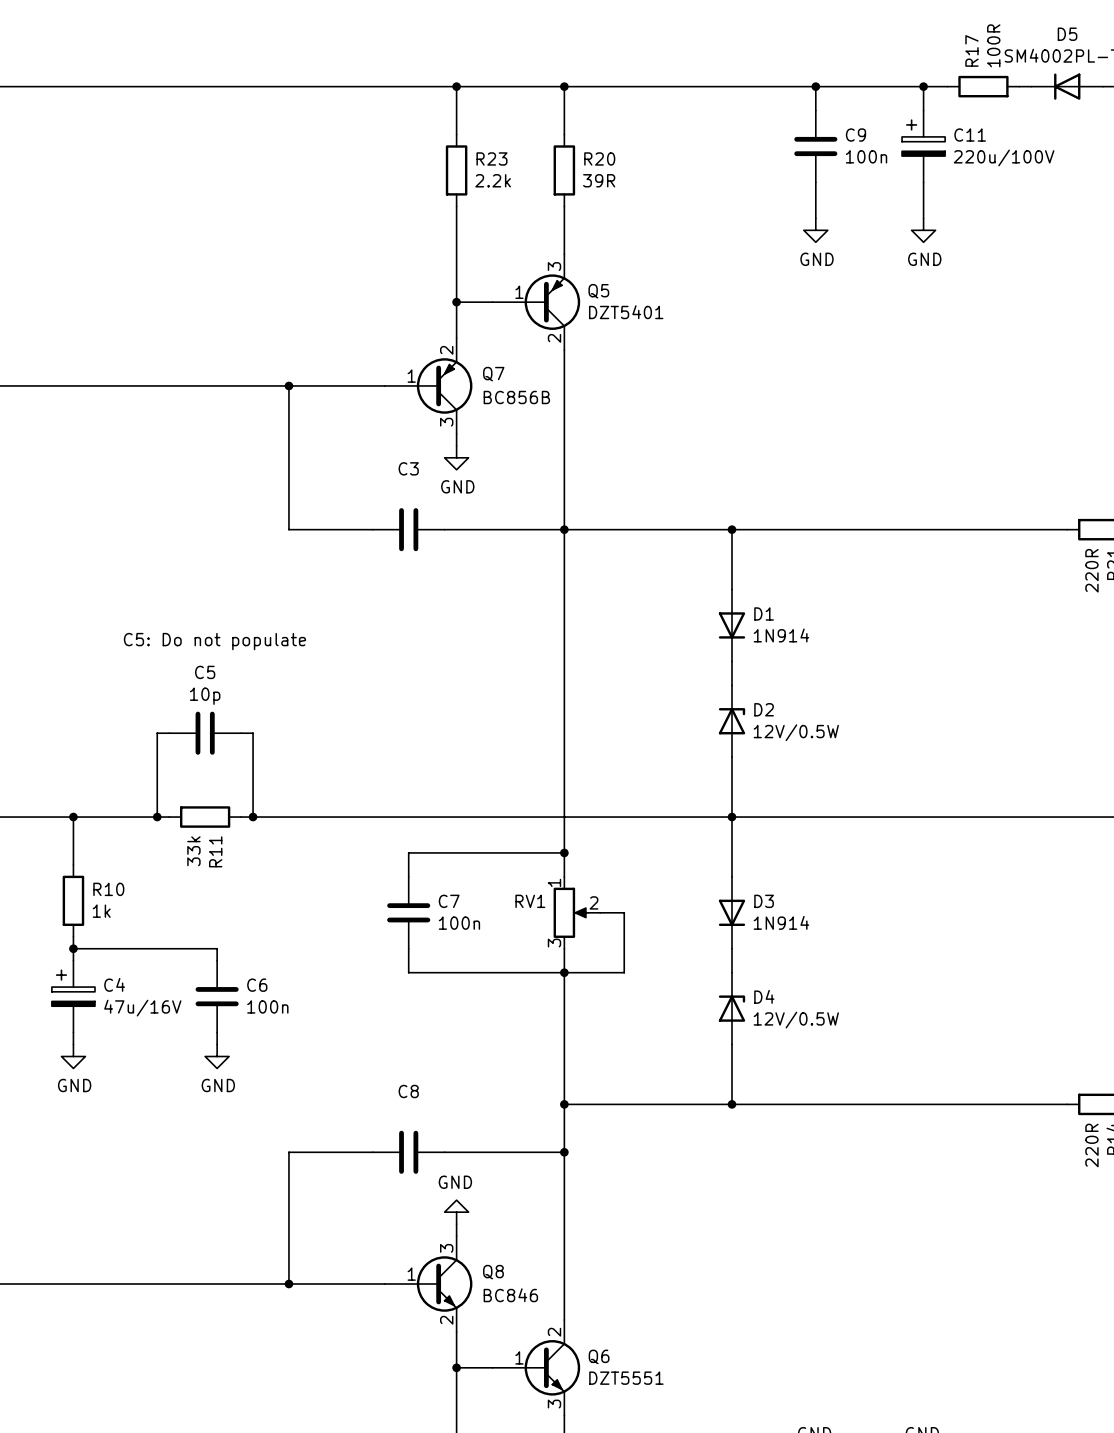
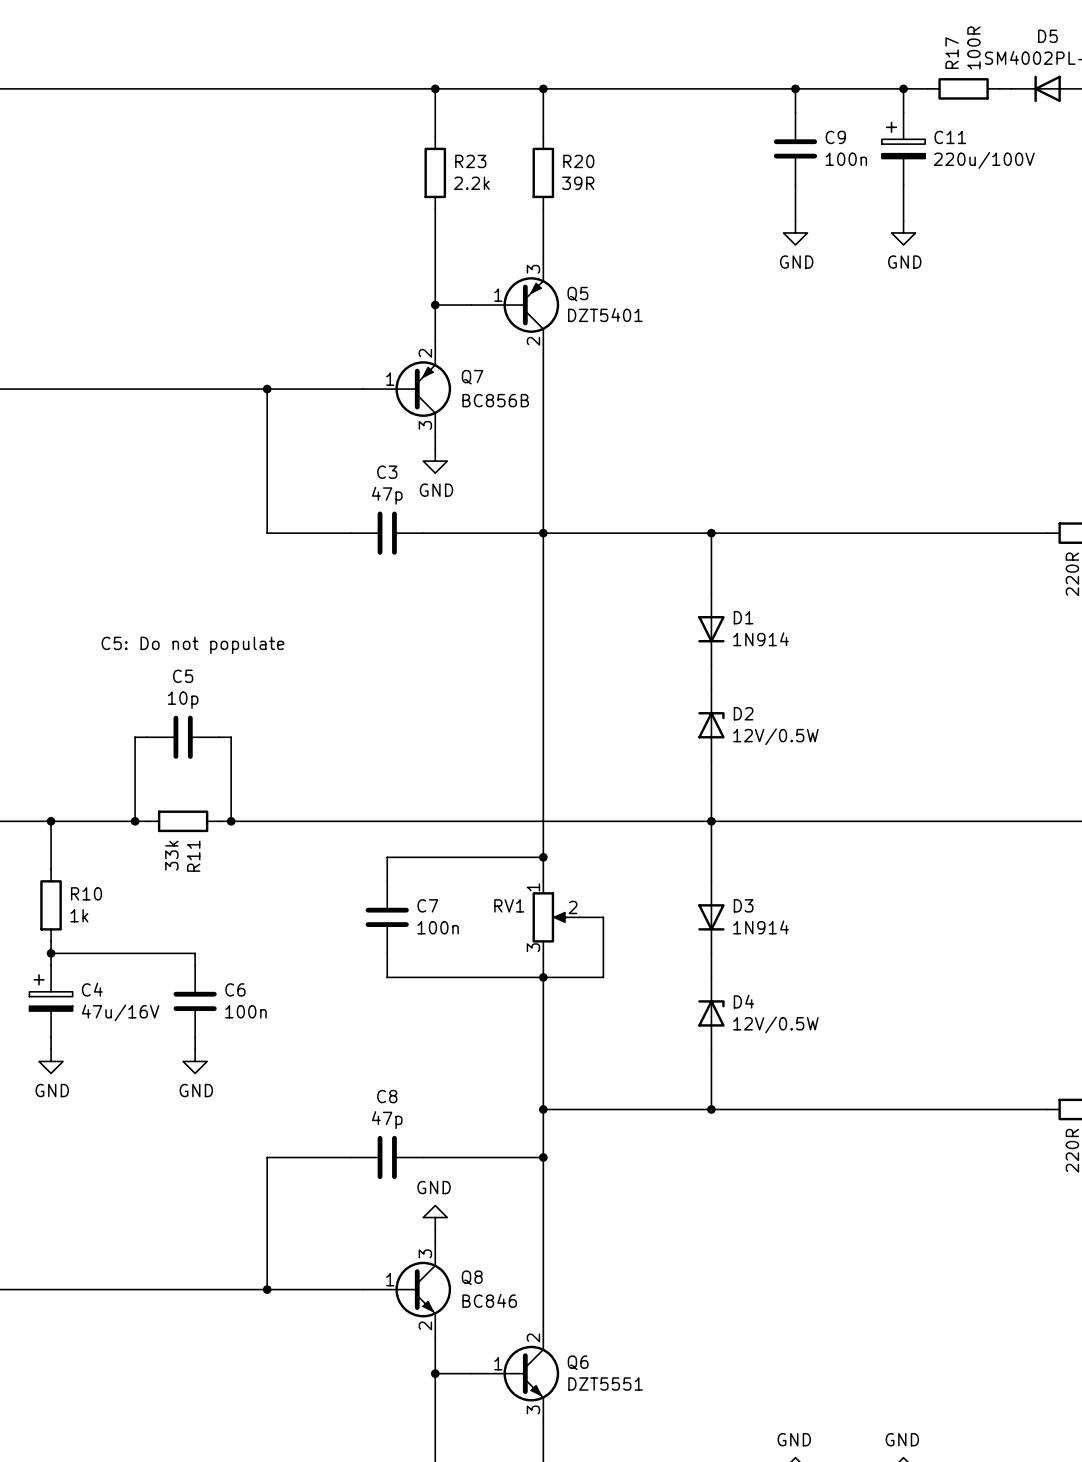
C3 value: none -> 47p (387, 495)
C8 value: none -> 47p (387, 1120)

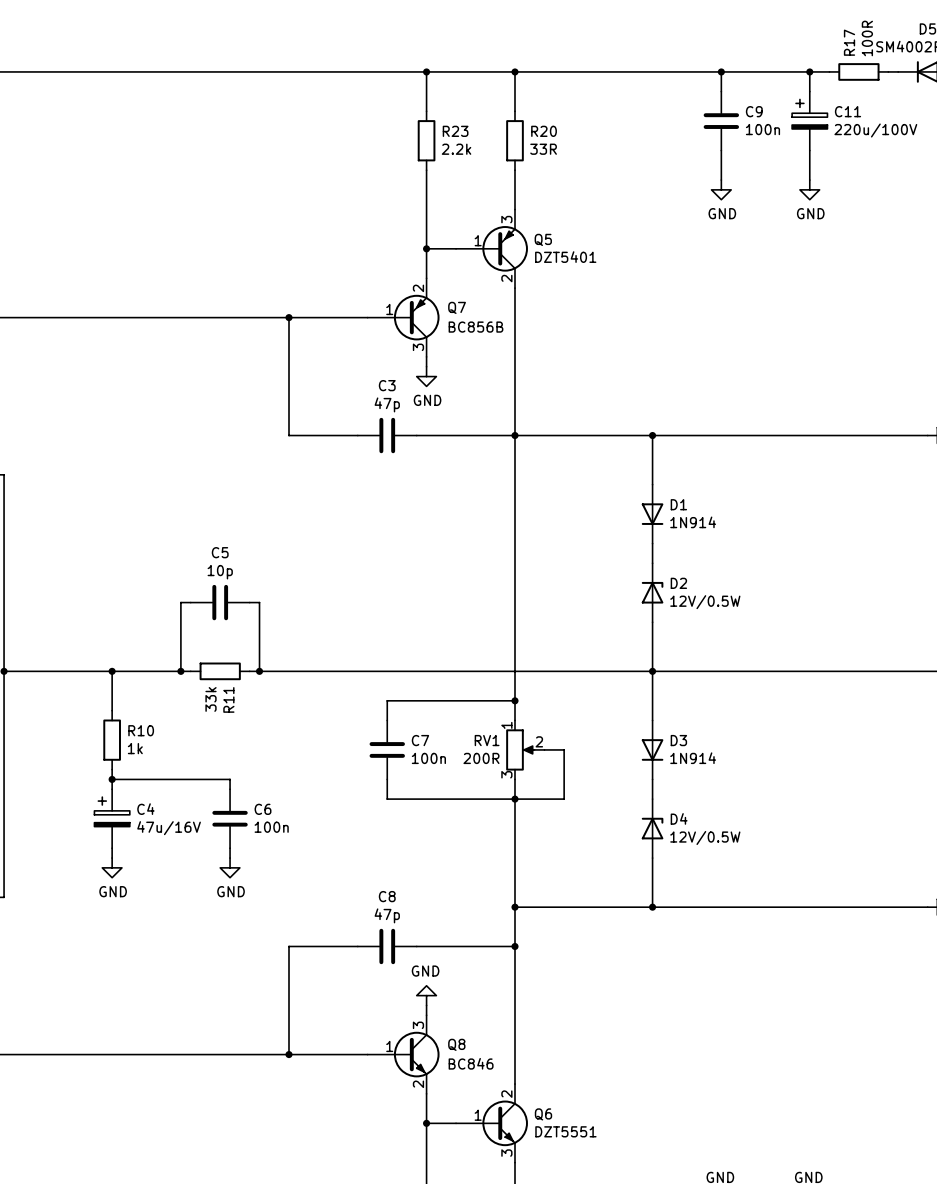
R20 value: 39R (578, 183) -> 33R (543, 149)
text: C5: Do not populate (192, 645) -> none
RV1 value: none -> 200R (481, 758)

